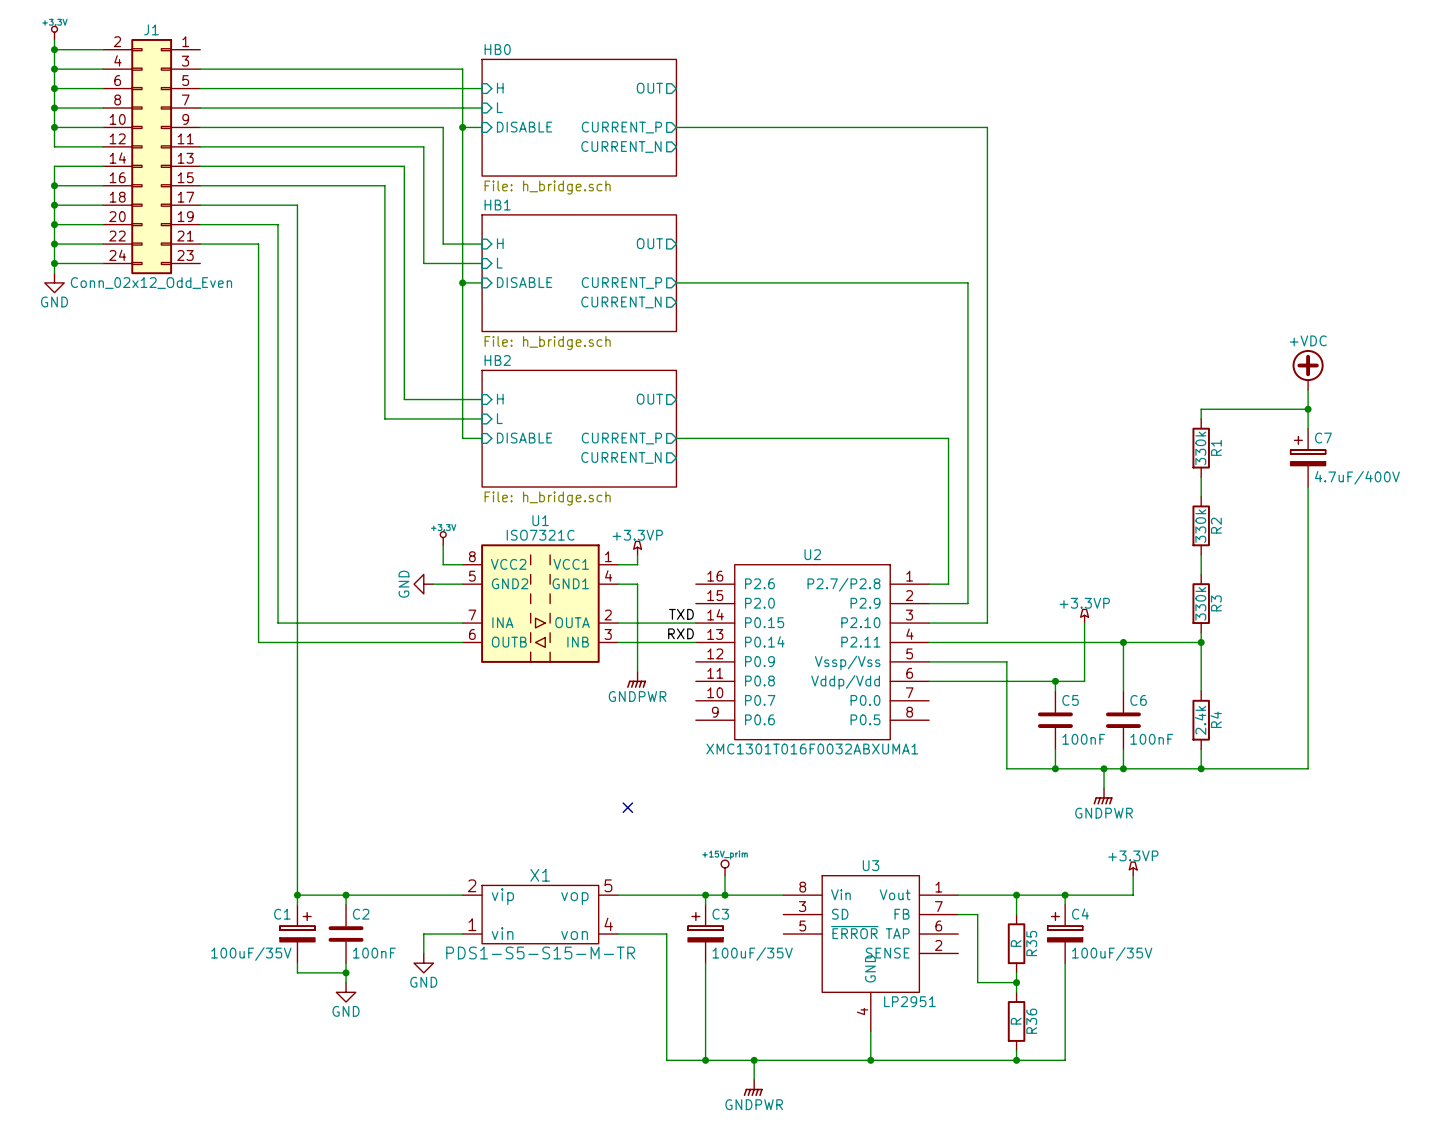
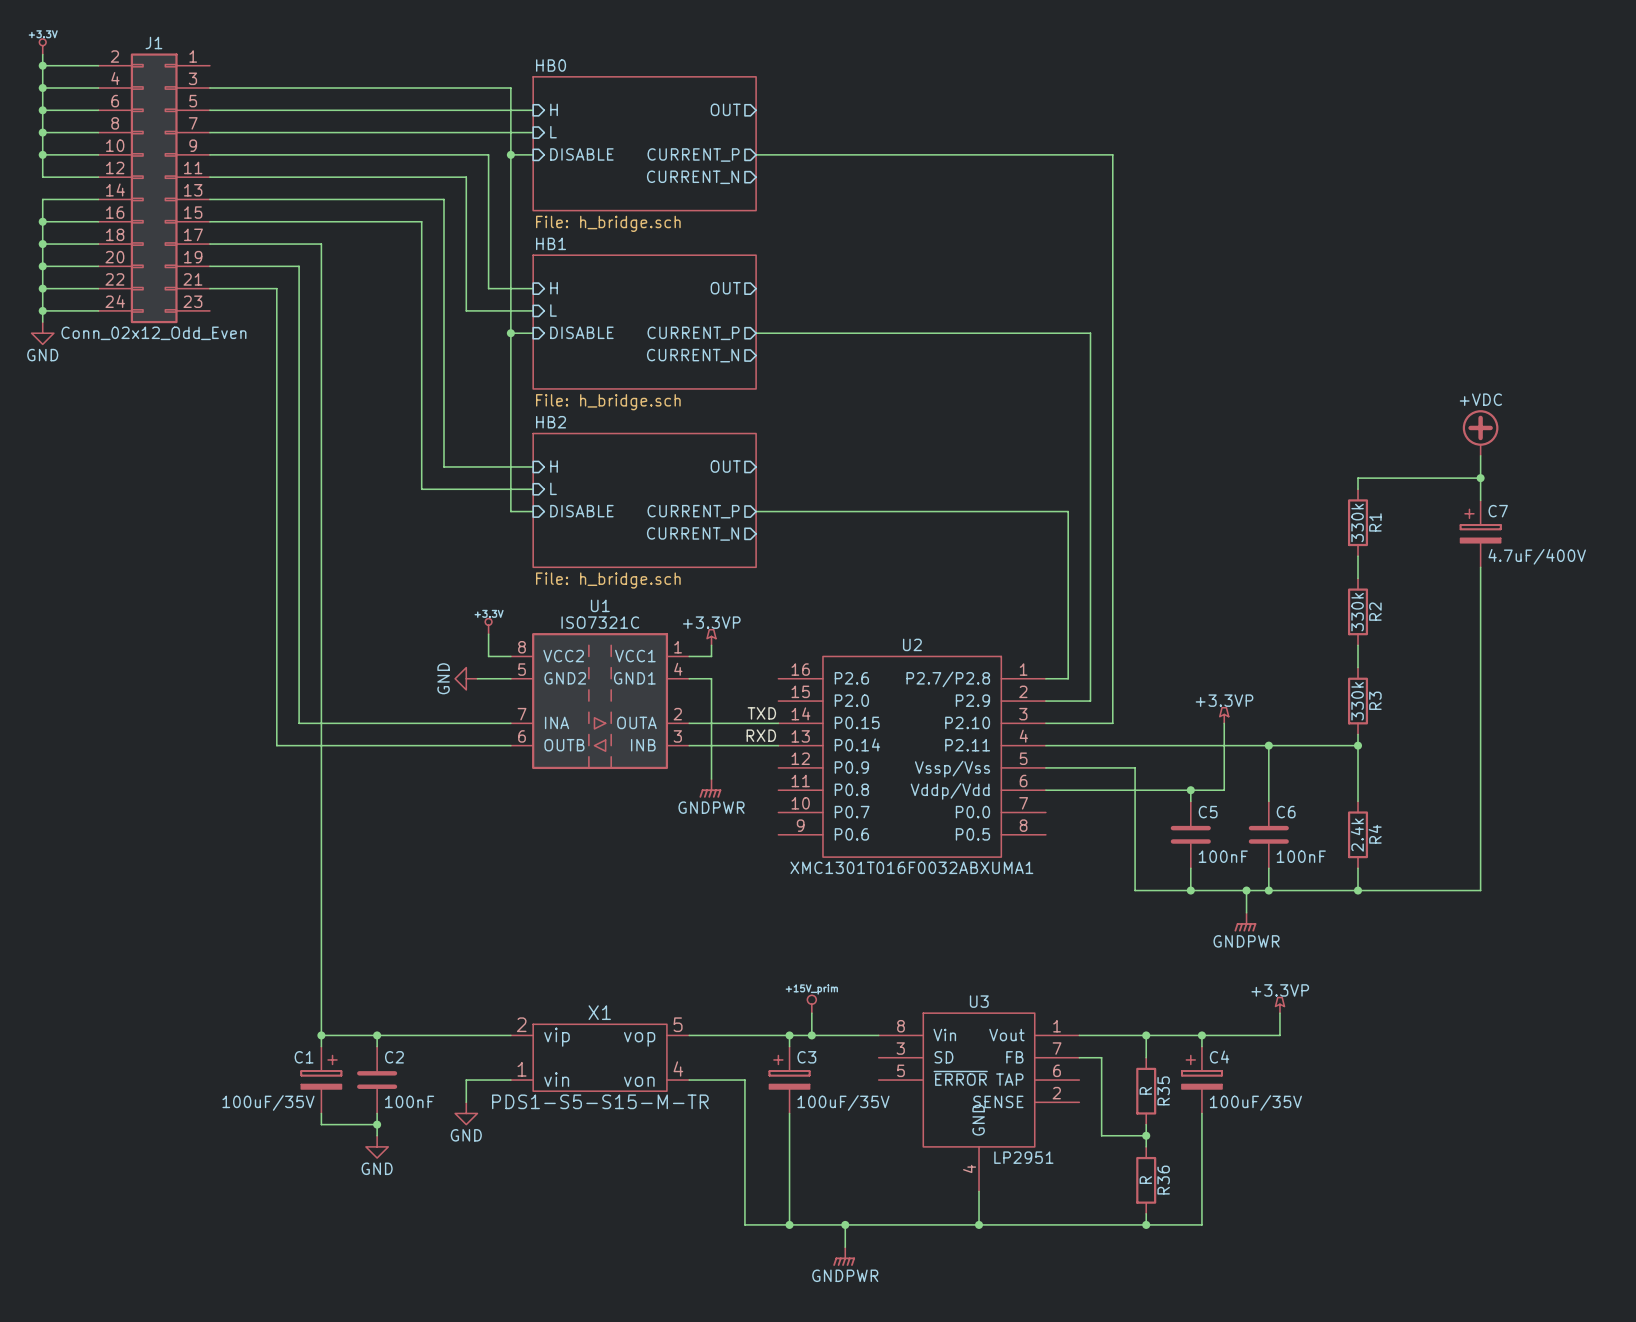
no-connect mark: (627, 807) -> none

